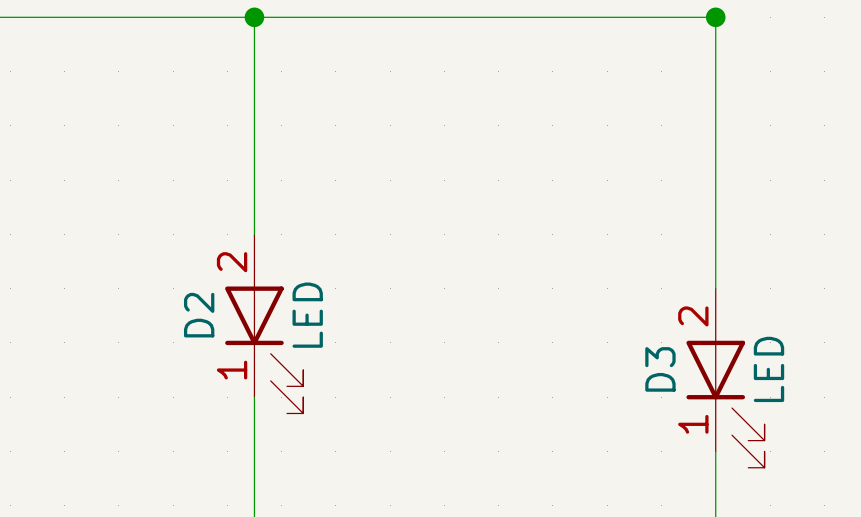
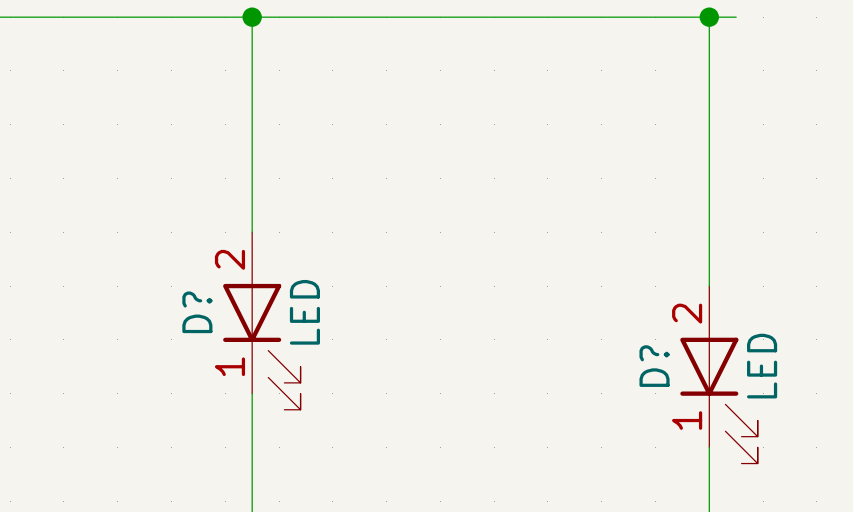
wire: none -> (709, 17) (736, 17)
D2 name: D2 (199, 315) -> D? (197, 312)
D3 name: D3 (660, 369) -> D? (654, 366)

